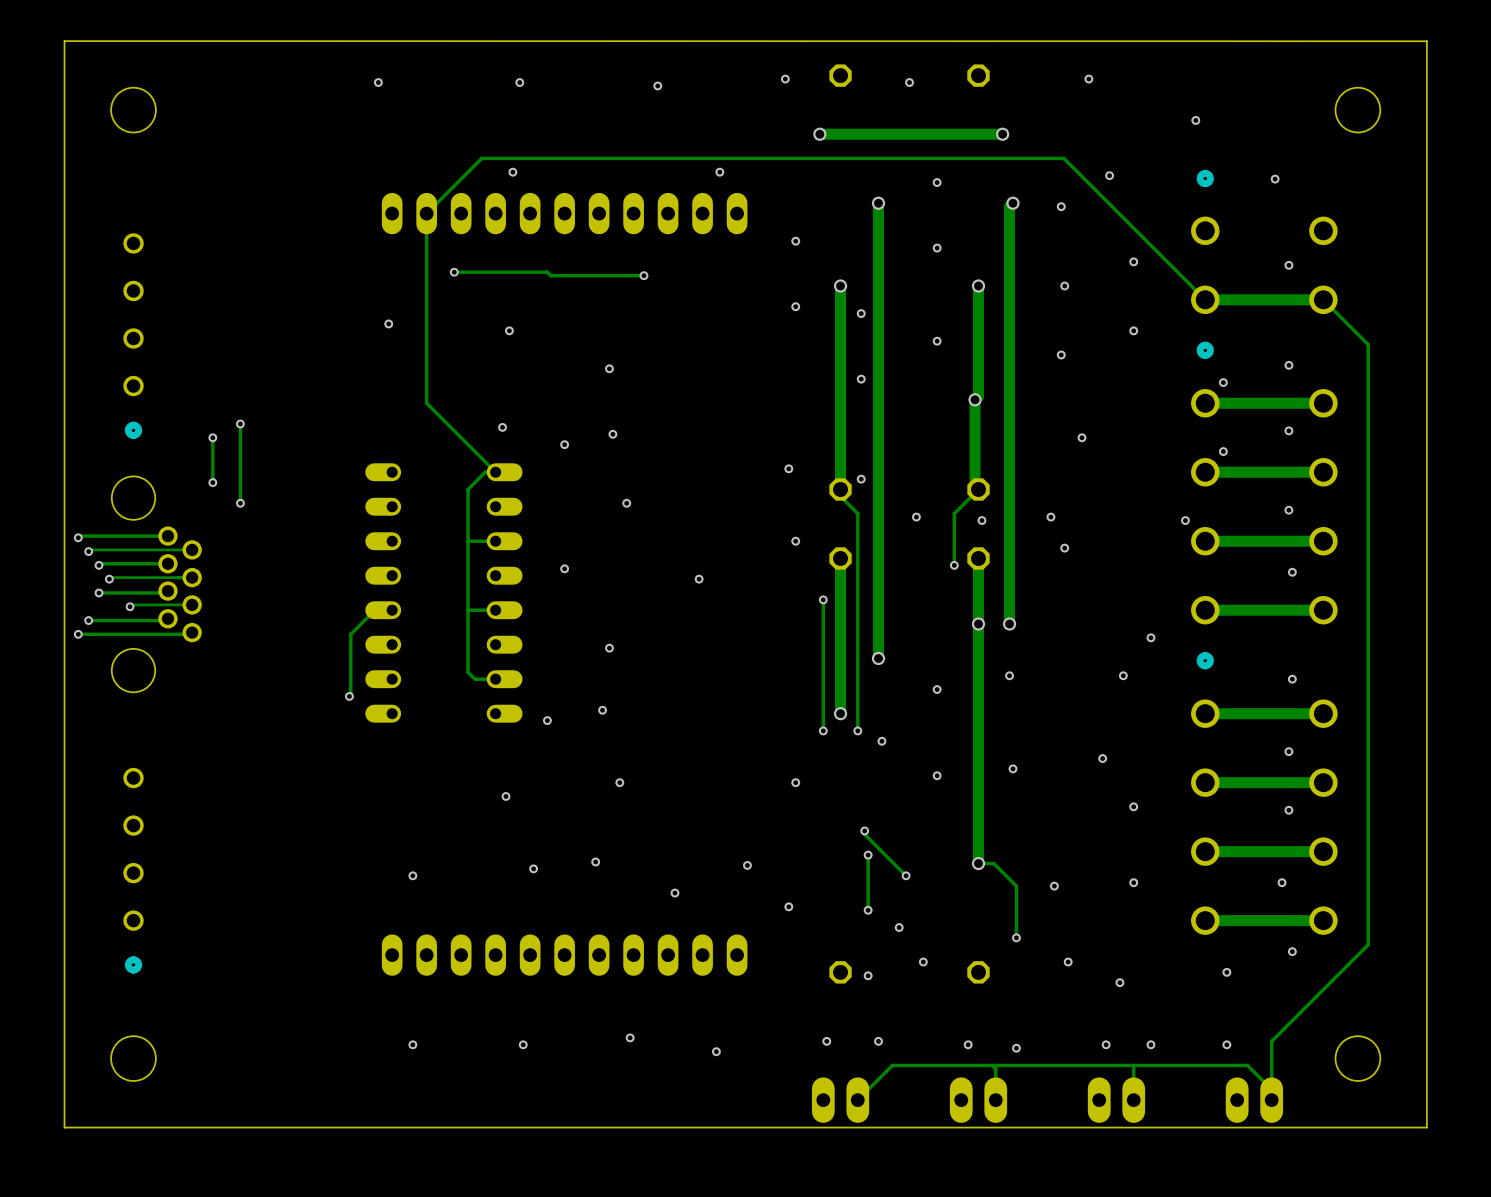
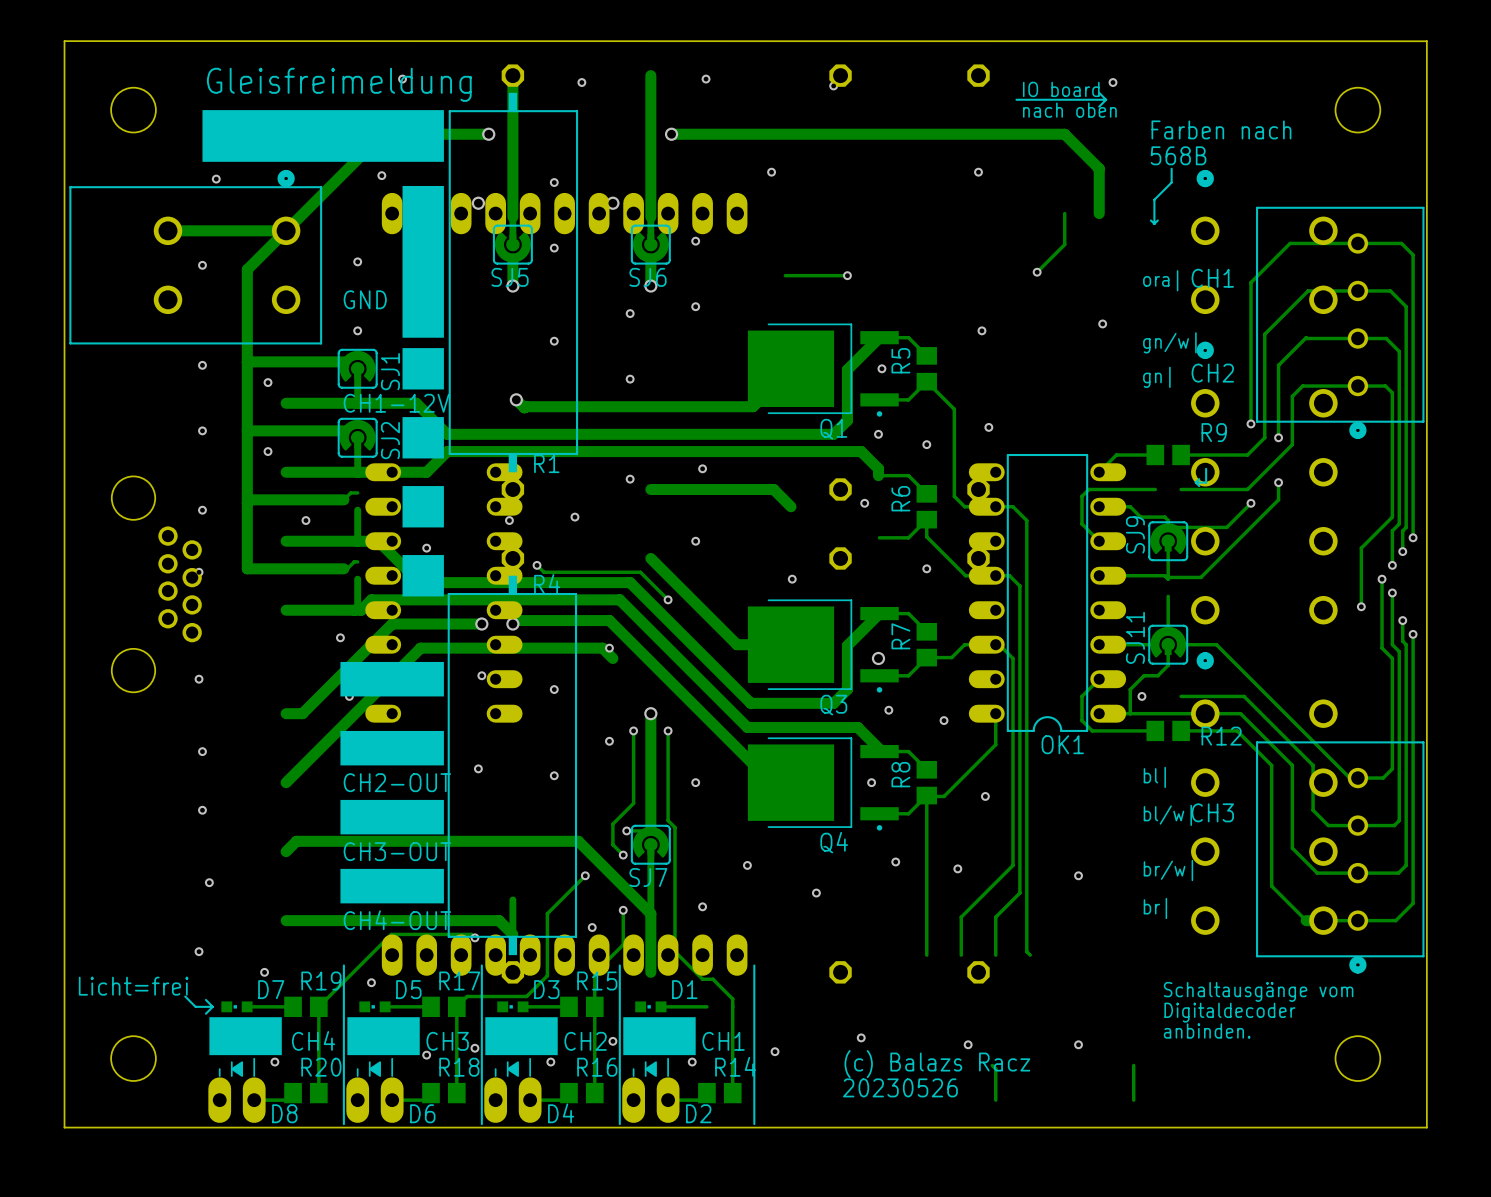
track: none -> (512, 75) (512, 241)
track: none -> (650, 75) (650, 241)
via: none -> (706, 79)
via: (785, 79) -> none
via position: (1088, 79) -> (1113, 82)
via position: (378, 82) -> (402, 79)
via: (519, 82) -> none
via: none -> (581, 82)
via: (909, 82) -> none
text: none -> Gleisfreimeldung (339, 84)
via: (657, 85) -> none
via: none -> (833, 85)
text: none -> IO board (1061, 89)
line: none -> (1099, 92) (1106, 99)
line: none -> (1106, 99) (1016, 99)
line: none -> (1106, 99) (1099, 106)
drawing: none -> [202, 110, 444, 162]
text: none -> nach oben (1069, 110)
via: (1195, 120) -> none
text: none -> Farben nach (1221, 129)
track: none -> (488, 134) (382, 134) (247, 269) (247, 568) (347, 568) (354, 561) (357, 561)
via: none -> (488, 134)
via: none -> (671, 134)
track: none -> (819, 134) (671, 134)
via: (819, 134) -> none
track: none -> (1002, 134) (1064, 134) (1099, 168) (1099, 213)
via: (1002, 134) -> none
text: none -> 568B (1178, 155)
line: none -> (1171, 168) (1171, 182) (1154, 199) (1154, 223)
via position: (512, 172) -> (554, 182)
via: (719, 172) -> none
via: none -> (771, 172)
via: none -> (381, 175)
via: (1109, 175) -> none
via: none -> (216, 179)
via: (1275, 179) -> none
via position: (937, 182) -> (978, 172)
drawing: none -> [402, 185, 444, 390]
via: none -> (478, 203)
via: none -> (612, 203)
track: (878, 203) (878, 468) -> (286, 472) (426, 472) (447, 451) (861, 451) (878, 468)
via: (878, 203) -> none
track: (1013, 203) (1009, 206) (1009, 624) -> none
via: (1013, 203) -> none
via: (1061, 206) -> none
track: none -> (1064, 213) (1064, 244) (1037, 272)
line: none -> (1150, 220) (1154, 223)
line: none -> (1157, 220) (1154, 223)
track: none -> (286, 230) (167, 230)
via: none -> (695, 241)
via: (795, 241) -> none
SJ5: none -> (512, 244)
SJ6: none -> (650, 244)
via: none -> (554, 248)
via: (937, 248) -> none
part: none -> (195, 257)
track: none -> (512, 258) (512, 286)
track: none -> (650, 258) (650, 286)
via: none -> (357, 261)
via: (1133, 261) -> none
via: none -> (202, 265)
via: (1288, 265) -> none
track: (454, 272) (547, 272) (550, 275) (643, 275) -> none
via: (454, 272) -> none
via: none -> (1037, 272)
via position: (643, 275) -> (650, 286)
track: none -> (847, 275) (785, 275)
text: none -> CH1 (1212, 278)
text: none -> ora| (1160, 280)
R1: none -> (513, 282)
via: none -> (512, 286)
track: (840, 286) (840, 496) (857, 513) (857, 730) -> none
via position: (840, 286) -> (847, 275)
track: (978, 286) (978, 396) (975, 399) (975, 486) (978, 489) (954, 513) (954, 565) -> none
via: (978, 286) -> none
via: (1064, 286) -> none
text: none -> GND (365, 299)
via: none -> (695, 306)
via: (795, 306) -> none
via: none -> (630, 313)
via: (861, 313) -> none
part: none -> (1340, 322)
via: (388, 323) -> none
via: none -> (1102, 323)
via: none -> (357, 330)
via: (509, 330) -> none
via: none -> (981, 330)
via: (1133, 330) -> none
part: (133, 336) -> none
via: none -> (554, 341)
via: (937, 341) -> none
text: none -> gn/w| (1169, 342)
track: none -> (357, 354) (354, 354) (347, 361) (247, 361)
via: (1061, 354) -> none
track: none -> (926, 355) (908, 337) (879, 337) (847, 369) (847, 420) (833, 434) (447, 434) (416, 403) (286, 403)
via: none -> (202, 365)
via: (1288, 365) -> none
SJ1: none -> (357, 368)
via position: (609, 368) -> (630, 379)
track: none -> (790, 368) (753, 406) (524, 407) (516, 399)
R5: none -> (926, 368)
Q1: none -> (823, 370)
track: none -> (357, 372) (357, 403)
text: none -> CH2 (1212, 373)
text: none -> gn| (1156, 377)
via position: (861, 379) -> (881, 368)
via: none -> (268, 382)
via: (1223, 382) -> none
via: none -> (516, 399)
track: none -> (879, 399) (908, 399) (926, 381) (954, 409) (954, 496) (964, 506) (1013, 506) (1026, 520) (1026, 951) (1030, 955)
via: (975, 399) -> none
text: none -> CH1-12V (396, 403)
track: (1323, 403) (1205, 403) -> none
drawing: none -> [402, 417, 444, 459]
track: (240, 423) (240, 503) -> none
via: (240, 423) -> none
track: none -> (357, 423) (354, 423) (347, 430) (247, 430)
track: none -> (1250, 423) (1250, 282) (1290, 243) (1401, 243) (1413, 254) (1413, 537)
via: none -> (1250, 423)
via: (502, 427) -> none
via: none -> (988, 427)
via position: (1288, 430) -> (1278, 437)
via: (612, 434) -> none
via: none -> (878, 434)
track: (212, 437) (212, 482) -> none
via position: (212, 437) -> (202, 430)
SJ2: none -> (357, 437)
via: (1081, 437) -> none
track: none -> (1278, 437) (1278, 365) (1306, 337) (1386, 338) (1399, 351) (1399, 523) (1392, 530) (1392, 565)
track: none -> (357, 441) (357, 472)
via: (564, 444) -> none
via: none -> (926, 444)
via: none -> (268, 451)
via: (1223, 451) -> none
track: none -> (1155, 455) (1116, 455) (1099, 472)
R9: none -> (1168, 455)
track: none -> (1181, 455) (1247, 455) (1264, 437) (1264, 334) (1308, 290) (1390, 290) (1406, 306) (1406, 527) (1402, 530) (1402, 551)
via: none -> (702, 468)
via: (788, 468) -> none
line: none -> (1206, 468) (1206, 482) (1195, 482)
track: (1323, 472) (1205, 472) -> none
track: (878, 475) (878, 658) -> (878, 475) (908, 475) (926, 493)
via: none -> (630, 479)
via: (861, 479) -> none
line: none -> (1199, 479) (1195, 482)
via: (212, 482) -> none
line: none -> (1195, 482) (1199, 486)
track: none -> (1278, 482) (1278, 499) (1200, 577) (1166, 577)
via: none -> (1278, 482)
drawing: none -> [402, 486, 444, 528]
track: none -> (650, 489) (773, 489) (790, 506)
track: none -> (1155, 489) (1088, 489) (1081, 496) (1081, 523) (1099, 541)
track: none -> (1181, 489) (1247, 489) (1292, 444) (1292, 396) (1302, 386) (1385, 386) (1392, 392) (1392, 517) (1361, 548) (1361, 606)
track: none -> (357, 492) (350, 492) (343, 499) (250, 499) (247, 503)
via: (240, 503) -> none
via: (626, 503) -> none
via: none -> (864, 503)
track: none -> (1250, 503) (1226, 527) (1168, 527) (1168, 520) (1164, 517) (1140, 517) (1130, 506) (1099, 506)
via: none -> (1250, 503)
R6: none -> (926, 506)
via: none -> (202, 510)
track: none -> (357, 510) (357, 541)
via: (1288, 510) -> none
via: none -> (574, 517)
via: (916, 517) -> none
via: (1050, 517) -> none
via: none -> (305, 520)
via: none -> (509, 520)
via: (981, 520) -> none
via: (1185, 520) -> none
track: (167, 536) (80, 536) (78, 537) -> none
via: (78, 537) -> none
track: none -> (879, 537) (908, 537) (926, 519) (926, 536) (965, 575) (1009, 575) (1019, 586) (1019, 893) (995, 917) (995, 955)
via: none -> (1413, 537)
track: none -> (286, 541) (378, 541) (419, 582) (630, 582) (750, 703) (833, 703) (847, 689) (847, 645) (879, 613) (908, 613) (926, 631)
track: (495, 541) (468, 541) -> none
via: none -> (695, 541)
via: (795, 541) -> none
SJ9: none -> (1168, 541)
track: (1323, 541) (1205, 541) -> none
track: none -> (1168, 544) (1168, 579) (1164, 575) (1099, 575)
via: none -> (426, 548)
via: (1064, 548) -> none
track: (192, 549) (90, 549) (88, 551) -> none
via: (88, 551) -> none
via: none -> (1402, 551)
drawing: none -> [402, 555, 444, 597]
track: none -> (650, 558) (737, 644) (790, 644)
track: (840, 558) (840, 713) -> none
track: (978, 558) (978, 863) (993, 863) (1016, 886) (1016, 937) -> none
track: (167, 563) (100, 563) (99, 565) -> none
via: (99, 565) -> none
track: none -> (537, 565) (543, 572) (640, 572) (668, 599)
via: none -> (537, 565)
via: (954, 565) -> none
via: none -> (1392, 565)
via: (564, 568) -> none
via: none -> (926, 568)
via: none -> (199, 572)
via: (1292, 572) -> none
track: (192, 577) (110, 577) (109, 579) -> none
via: (109, 579) -> none
track: none -> (357, 579) (357, 606) (354, 610)
via: (699, 579) -> none
via: none -> (792, 579)
track: none -> (1382, 579) (1382, 648) (1392, 658) (1392, 768) (1383, 778) (1349, 778) (1216, 644) (1185, 644) (1171, 630) (1161, 630) (1157, 634) (1157, 641) (1154, 644) (1099, 644)
via: none -> (1382, 579)
track: (167, 591) (166, 592) (99, 592) -> none
via: (99, 592) -> none
OK1: none -> (1047, 592)
track: none -> (1392, 592) (1392, 644) (1399, 651) (1399, 820) (1394, 825) (1328, 825) (1313, 810) (1313, 765) (1244, 696) (1181, 696)
via: none -> (1392, 592)
track: none -> (1168, 596) (1168, 630)
via: none -> (668, 599)
track: (823, 599) (823, 730) -> none
via: (823, 599) -> none
track: (192, 604) (131, 604) (130, 606) -> none
via: (130, 606) -> none
via: none -> (1361, 606)
track: none -> (286, 610) (361, 610) (371, 599) (619, 599) (747, 727) (857, 727) (881, 751)
track: (392, 610) (374, 610) (350, 634) (349, 696) -> none
track: (495, 610) (468, 610) -> none
track: (1323, 610) (1205, 610) -> none
track: (167, 618) (166, 620) (88, 620) -> none
via: (88, 620) -> none
via: none -> (1402, 620)
track: none -> (481, 624) (392, 624) (302, 713) (286, 713)
via: none -> (481, 624)
track: none -> (512, 624) (516, 620) (609, 620) (771, 782) (790, 782)
via: none -> (512, 624)
via: (978, 624) -> none
via: (1009, 624) -> none
track: (192, 632) (190, 634) (78, 634) -> none
via: (78, 634) -> none
track: none -> (1413, 634) (1413, 903) (1395, 920) (1323, 920)
via: none -> (1413, 634)
via: none -> (340, 637)
via: (1150, 637) -> none
R7: none -> (926, 644)
SJ11: none -> (1168, 644)
Q3: none -> (823, 646)
track: none -> (1168, 648) (1168, 665) (1157, 675) (1144, 675) (1130, 689) (1130, 713)
track: none -> (612, 658) (602, 648) (420, 648) (286, 782)
drawing: none -> [340, 661, 444, 697]
via: none -> (481, 675)
track: none -> (879, 675) (908, 675) (926, 657) (951, 657) (964, 644) (999, 644) (1013, 658) (1013, 865) (961, 917) (961, 955)
via: (1009, 675) -> none
via position: (1123, 675) -> (1141, 696)
via: none -> (199, 679)
track: (495, 679) (474, 679) (468, 672) (468, 489) (485, 472) (495, 472) (426, 403) (426, 213) (481, 158) (1063, 158) (1205, 299) (1323, 299) (1368, 344) (1368, 944) (1271, 1041) (1271, 1100) -> none
track: none -> (1099, 679) (1081, 696) (1081, 720) (1092, 730) (1155, 730)
via: (1292, 679) -> none
via: none -> (554, 689)
via: (937, 689) -> none
via: (602, 710) -> none
via: none -> (888, 710)
track: none -> (650, 713) (650, 830) (626, 830)
via: none -> (650, 713)
via: (840, 713) -> none
track: none -> (995, 713) (995, 744) (944, 796) (926, 795)
track: none -> (1205, 713) (1099, 713)
track width: thick (1240, 713) (1205, 713) -> thin (1240, 713) (1205, 713)
track: (1323, 713) (1240, 713) -> (1402, 620) (1402, 641) (1406, 644) (1406, 865) (1398, 873) (1317, 873) (1292, 848) (1292, 765) (1240, 713)
via: (547, 720) -> none
via: none -> (944, 720)
drawing: none -> [340, 730, 444, 766]
track: none -> (633, 730) (633, 803) (612, 824) (612, 844) (623, 855)
via: none -> (633, 730)
track: none -> (668, 730) (668, 820) (674, 827) (674, 951) (702, 979) (712, 979) (732, 999) (732, 1093)
via: none -> (668, 730)
via: (823, 730) -> none
via: (857, 730) -> none
R12: none -> (1168, 730)
via: none -> (609, 741)
via: (881, 741) -> none
via: none -> (202, 751)
track: none -> (879, 751) (908, 751) (926, 769)
via: (1288, 751) -> none
via: (1102, 758) -> none
R4: none -> (512, 765)
via: none -> (478, 768)
via: (1013, 768) -> none
via: none -> (554, 775)
via: (937, 775) -> none
text: none -> bl| (1154, 777)
text: none -> CH2-OUT (397, 782)
via: (619, 782) -> none
via: none -> (695, 782)
via: (795, 782) -> none
via: none -> (871, 782)
R8: none -> (926, 782)
track: (1323, 782) (1205, 782) -> none
Q4: none -> (823, 783)
track: none -> (926, 795) (926, 955)
track: none -> (926, 795) (908, 813) (879, 813)
via: (505, 796) -> none
via: none -> (985, 796)
drawing: none -> [340, 799, 444, 835]
via: (1133, 806) -> none
via: none -> (202, 810)
via: (1288, 810) -> none
text: none -> CH3 (1212, 812)
text: none -> bl/w| (1167, 815)
via: none -> (626, 830)
track: (864, 830) (864, 834) (906, 875) -> none
via: (864, 830) -> none
SJ7: none -> (650, 844)
track: none -> (650, 848) (650, 913)
track: none -> (286, 851) (296, 841) (578, 841) (650, 913)
text: none -> CH3-OUT (397, 851)
track: (1323, 851) (1205, 851) -> none
via: none -> (623, 855)
track: (868, 855) (868, 910) -> none
via: (868, 855) -> none
part: none -> (1340, 857)
via: (595, 861) -> none
via: none -> (895, 861)
via: (978, 863) -> none
drawing: none -> [340, 868, 444, 904]
via: (533, 868) -> none
via: none -> (957, 868)
part: (133, 870) -> none
text: none -> br/w| (1168, 870)
track: none -> (585, 875) (547, 913) (547, 975) (526, 996) (467, 996) (456, 1006) (456, 1093)
via: none -> (585, 875)
via: (906, 875) -> none
via: none -> (209, 882)
via: (1133, 882) -> none
via: (1282, 882) -> none
via position: (1054, 886) -> (1078, 875)
via: (674, 893) -> none
via: none -> (816, 893)
track: none -> (512, 899) (512, 934) (499, 920) (286, 920)
via: none -> (702, 906)
via: (788, 906) -> none
text: none -> br| (1155, 908)
track: none -> (623, 910) (623, 944) (594, 973) (594, 1093)
via: none -> (623, 910)
via: (868, 910) -> none
track: none -> (650, 913) (650, 972)
text: none -> CH4-OUT (397, 920)
track: (1306, 920) (1205, 920) -> (1306, 920) (1271, 886) (1271, 765) (1237, 730) (1181, 730)
via: none -> (592, 927)
via: (899, 927) -> none
track: none -> (474, 937) (471, 934) (391, 934) (318, 1006) (318, 1093)
via: none -> (474, 937)
via: (1016, 937) -> none
via: none -> (199, 951)
via: (1292, 951) -> none
via: (923, 962) -> none
via: (1068, 962) -> none
line: none -> (343, 965) (343, 1124)
line: none -> (481, 965) (481, 1124)
line: none -> (619, 965) (619, 1124)
line: none -> (754, 965) (754, 1124)
via: none -> (264, 972)
via: (1226, 972) -> none
via: (868, 975) -> none
via: none -> (371, 982)
via: (1119, 982) -> none
text: none -> Licht=frei (133, 986)
text: none -> Schaltausgänge vom (1258, 991)
line: none -> (185, 996) (195, 1006) (212, 1006)
line: none -> (205, 999) (212, 1006)
line: none -> (212, 1006) (205, 1013)
D7: none -> (236, 1006)
track: none -> (293, 1006) (247, 1006)
R19: none -> (305, 1006)
D5: none -> (374, 1006)
track: none -> (431, 1006) (385, 1006)
R17: none -> (443, 1006)
D3: none -> (512, 1006)
track: none -> (568, 1006) (523, 1006)
R15: none -> (581, 1006)
D1: none -> (650, 1006)
track: none -> (706, 1006) (661, 1006)
text: none -> Digitaldecoder (1229, 1012)
drawing: none -> [209, 1017, 282, 1056]
drawing: none -> [347, 1017, 420, 1056]
drawing: none -> [485, 1017, 558, 1056]
drawing: none -> [623, 1017, 696, 1056]
text: none -> anbinden. (1207, 1030)
via position: (630, 1037) -> (612, 1041)
via: none -> (861, 1037)
text: none -> CH4 (313, 1040)
text: none -> CH3 (447, 1041)
text: none -> CH2 (585, 1041)
text: none -> CH1 (723, 1041)
via: (826, 1041) -> none
via: (878, 1041) -> none
via position: (412, 1044) -> (426, 1055)
via: (523, 1044) -> none
via position: (1106, 1044) -> (1078, 1044)
via: (1150, 1044) -> none
via: (1226, 1044) -> none
via: none -> (474, 1048)
via: (1016, 1048) -> none
via position: (716, 1051) -> (692, 1062)
via: none -> (775, 1051)
via: none -> (274, 1062)
via: none -> (550, 1062)
text: none -> (c) Balazs Racz (937, 1064)
text: none -> 20230526 (900, 1087)
track: (1271, 1089) (1247, 1065) (892, 1065) (857, 1100) -> none
D8: none -> (236, 1090)
D6: none -> (374, 1090)
D4: none -> (512, 1090)
track: none -> (293, 1093) (285, 1100) (254, 1100)
R20: none -> (305, 1093)
track: none -> (431, 1093) (423, 1100) (392, 1100)
R18: none -> (443, 1093)
track: none -> (568, 1093) (561, 1100) (530, 1100)
R16: none -> (581, 1093)
track: none -> (706, 1093) (699, 1100) (668, 1100)
R14: none -> (719, 1093)
D2 side: top (840, 1100) -> bottom (650, 1090)
part: (978, 1100) -> none
part: (1116, 1100) -> none
part: (1254, 1100) -> none

